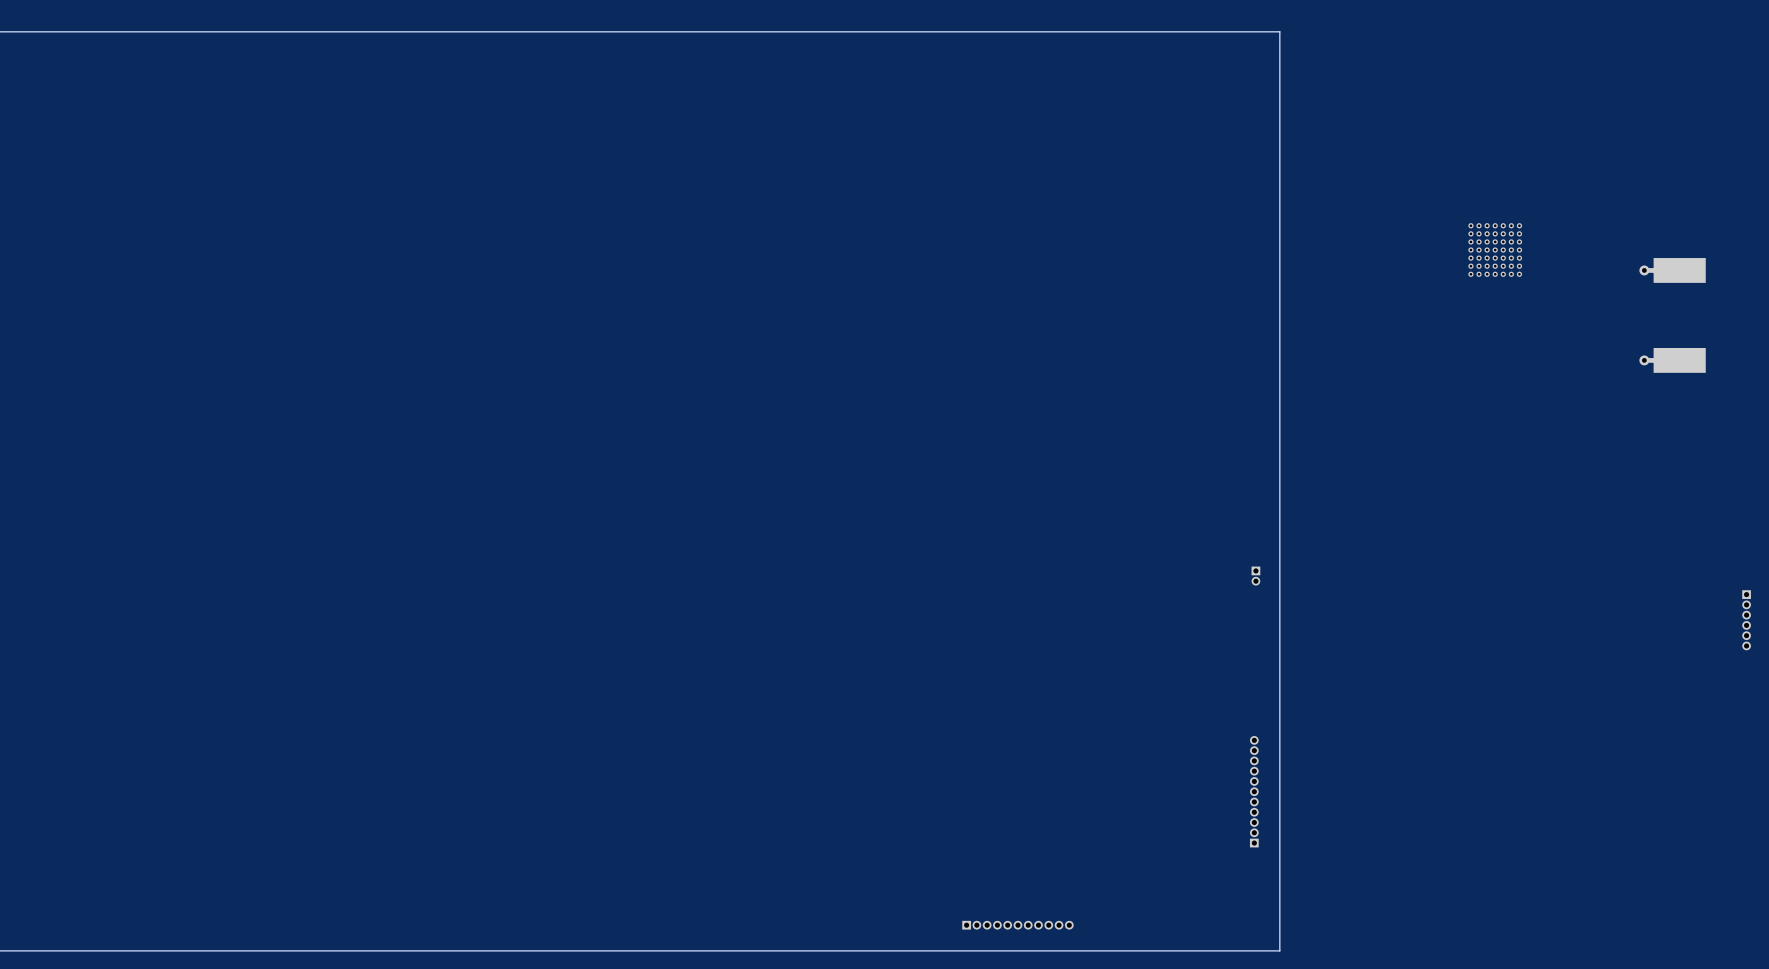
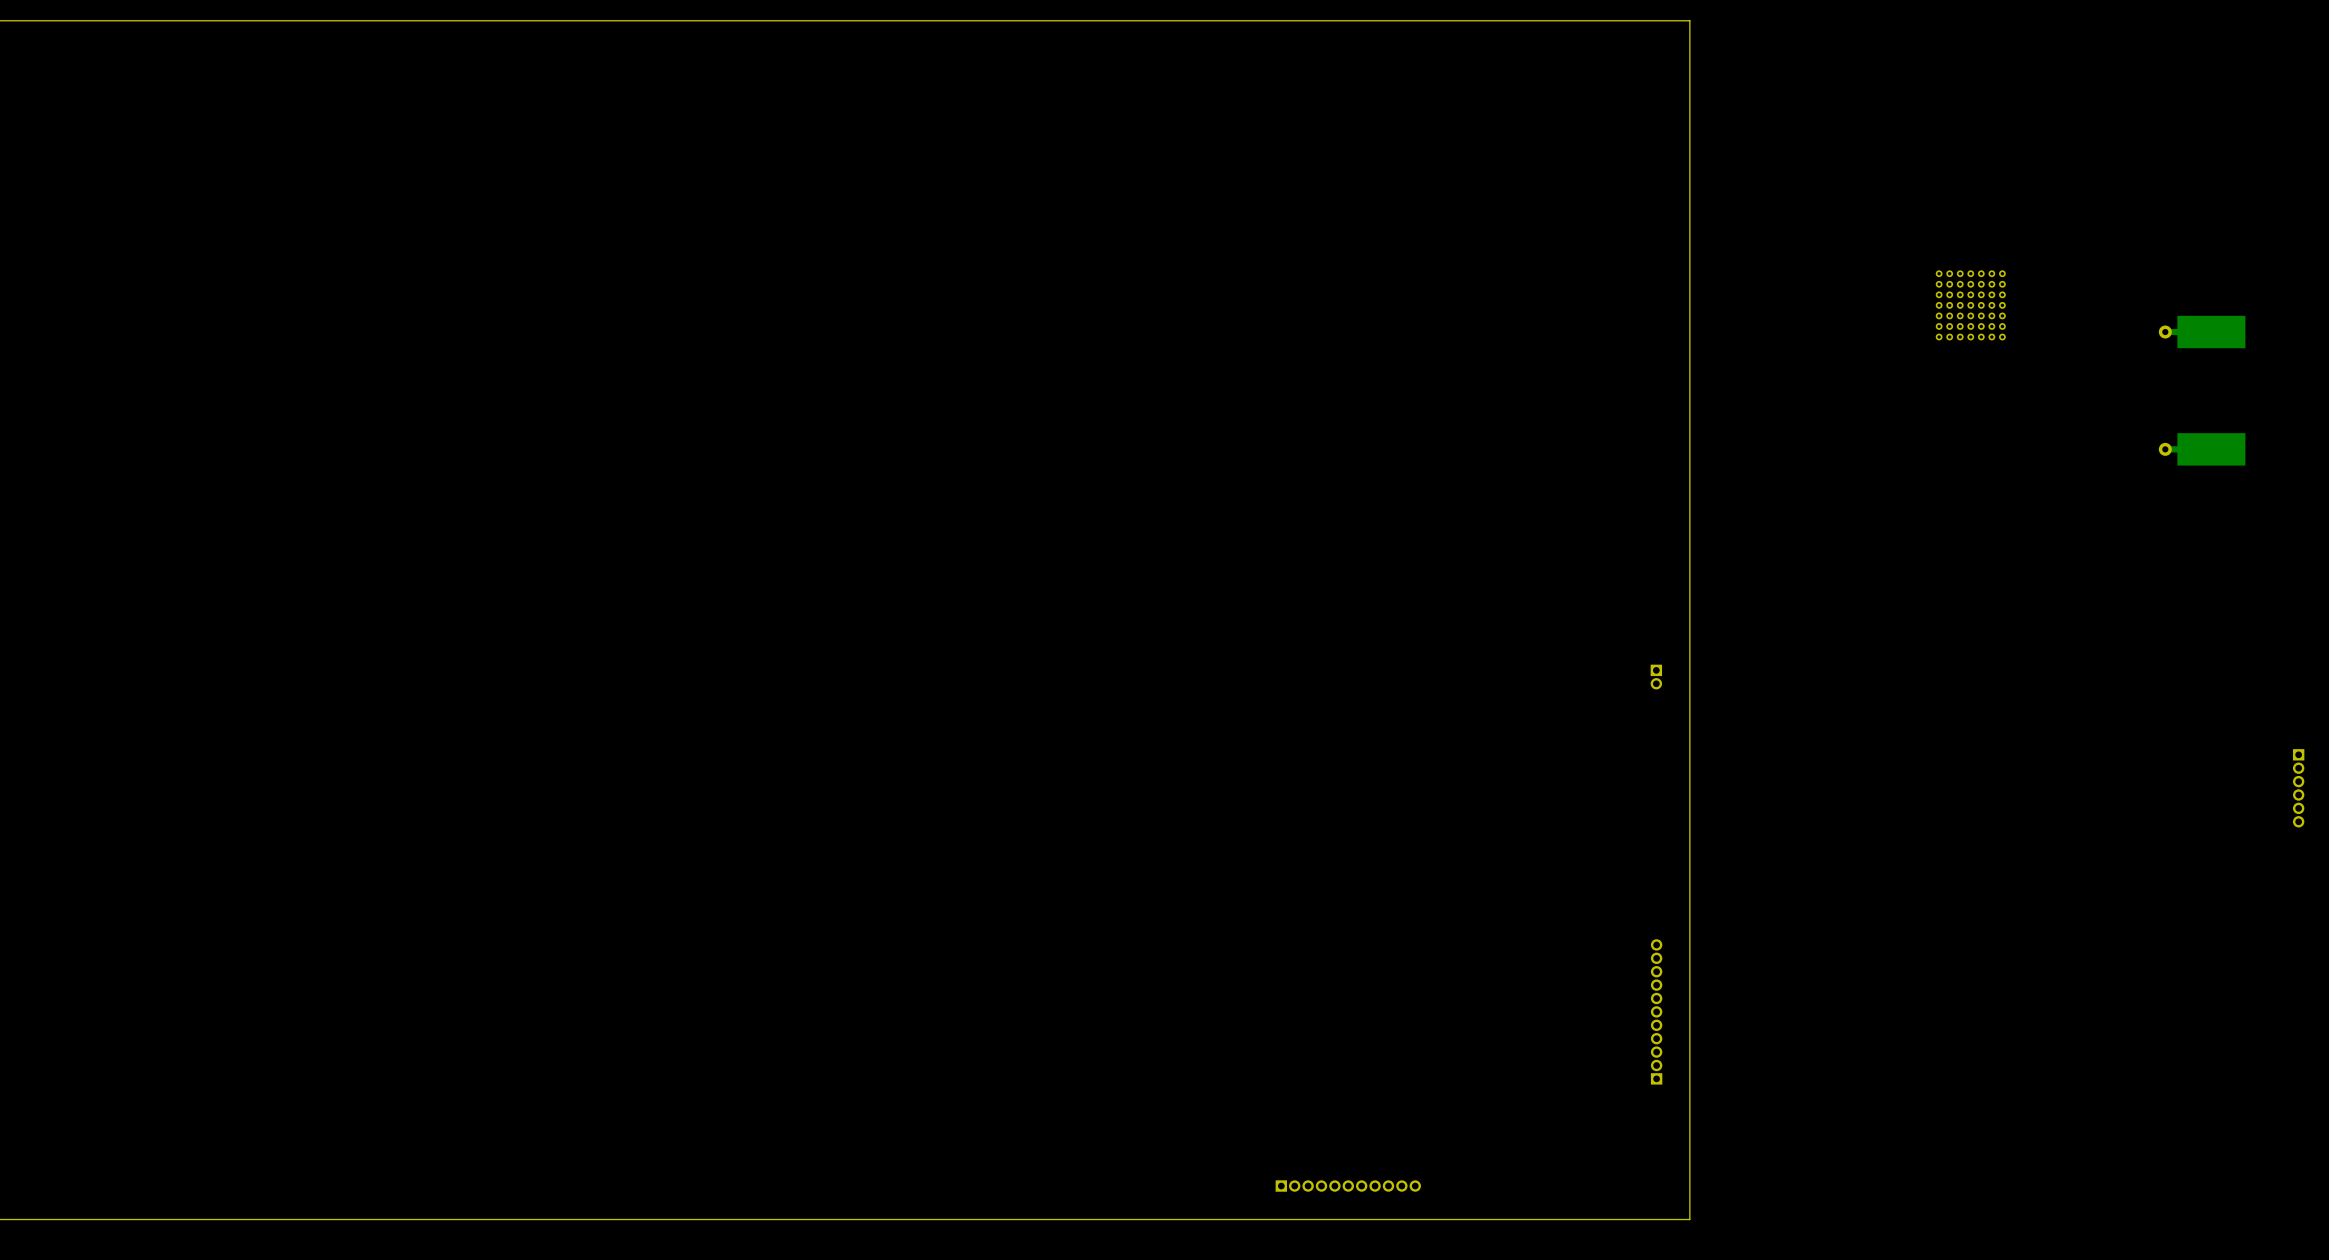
part position: (1255, 576) -> (1656, 677)

